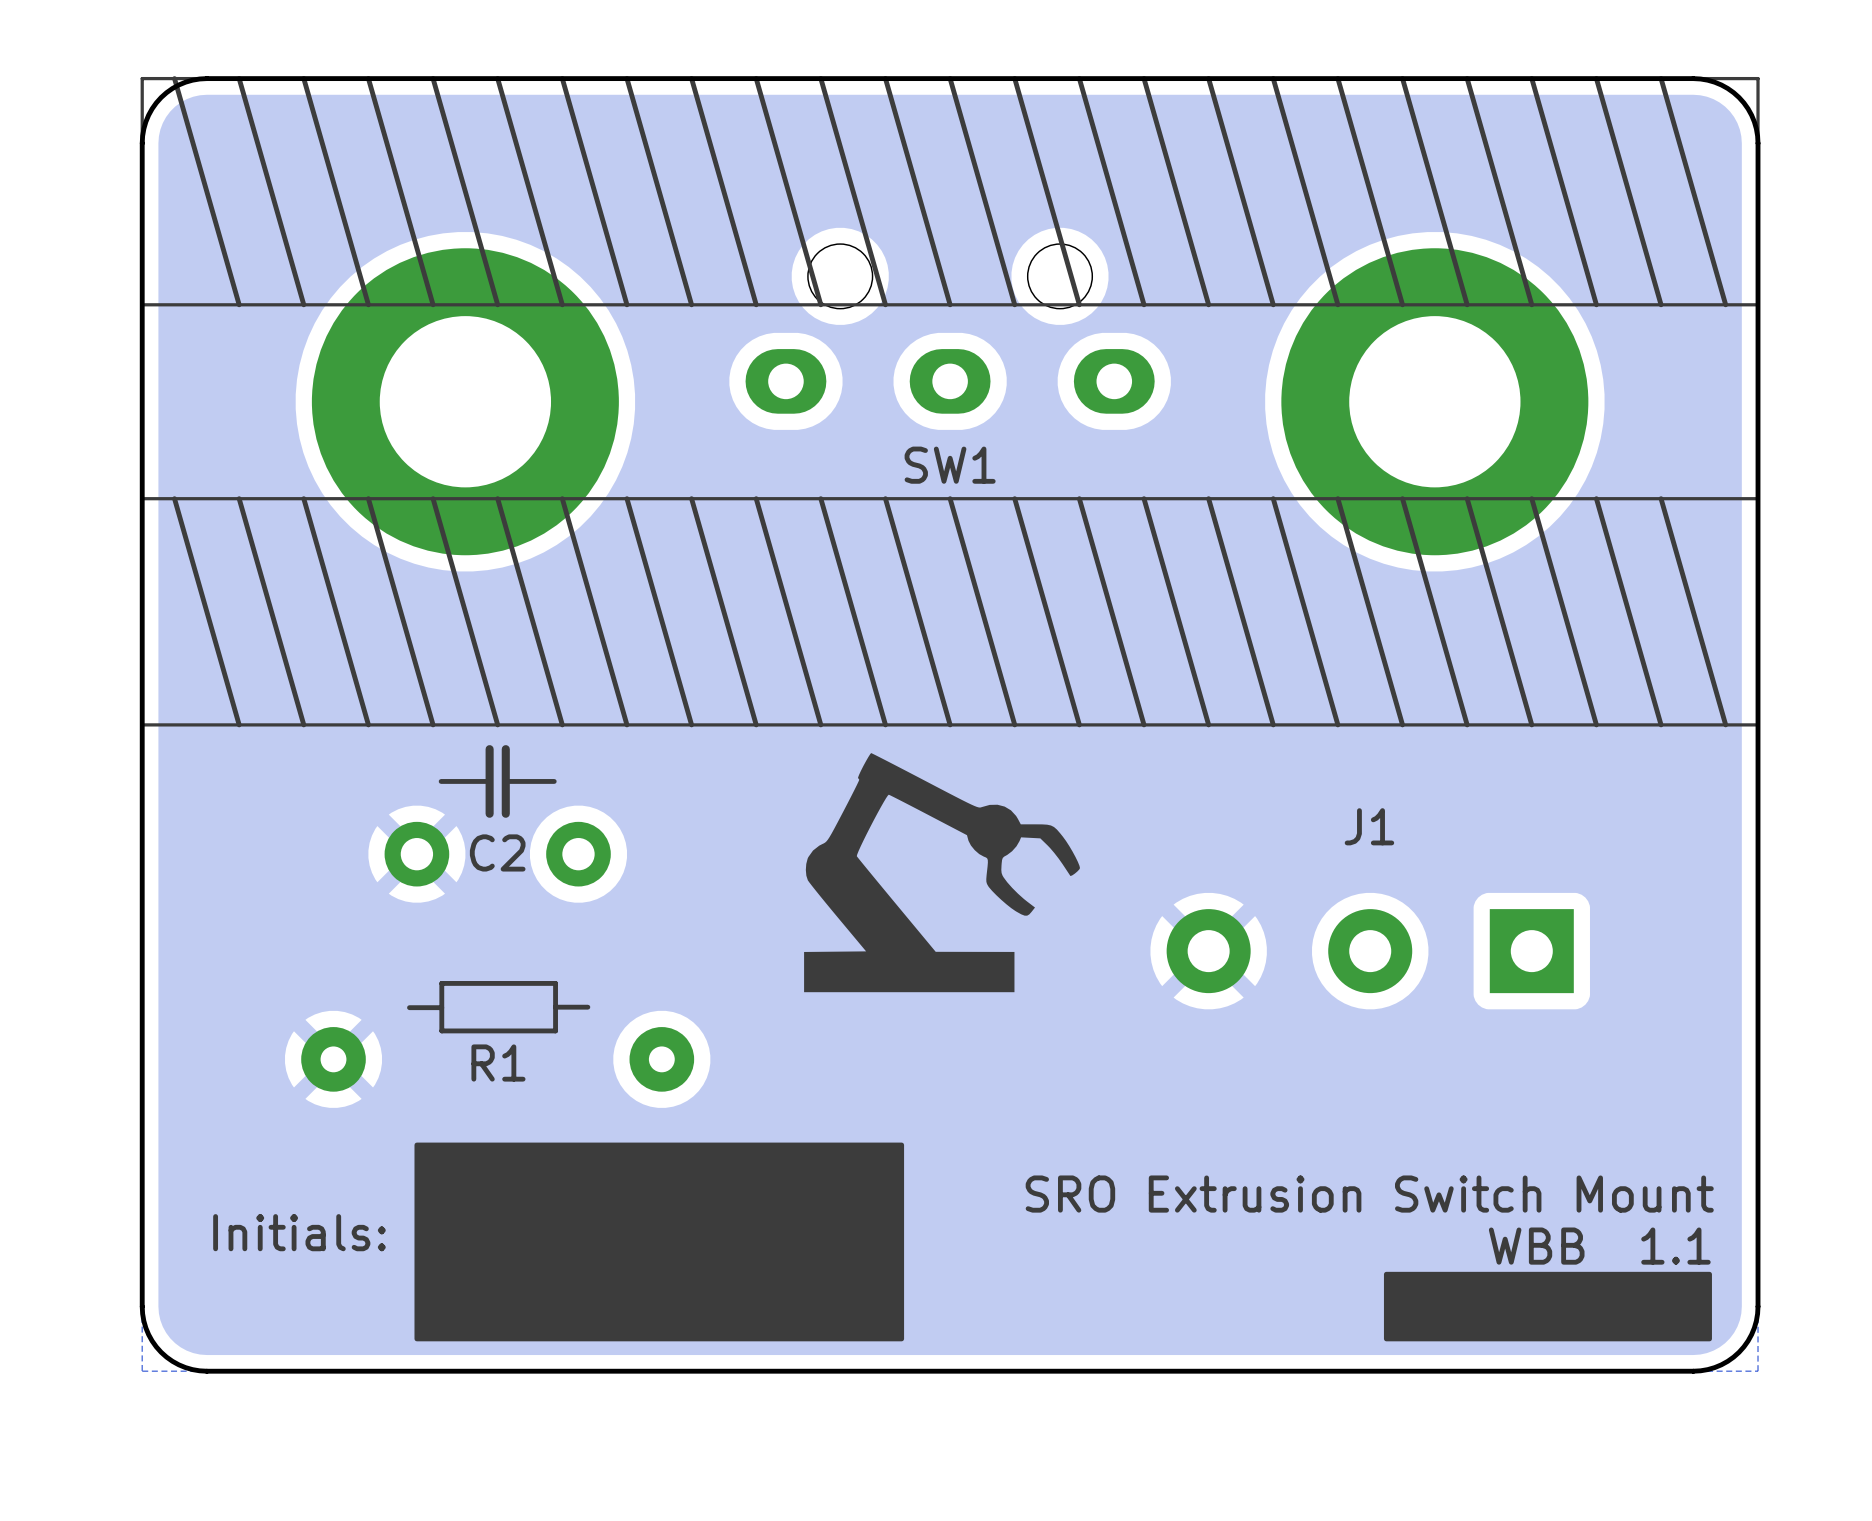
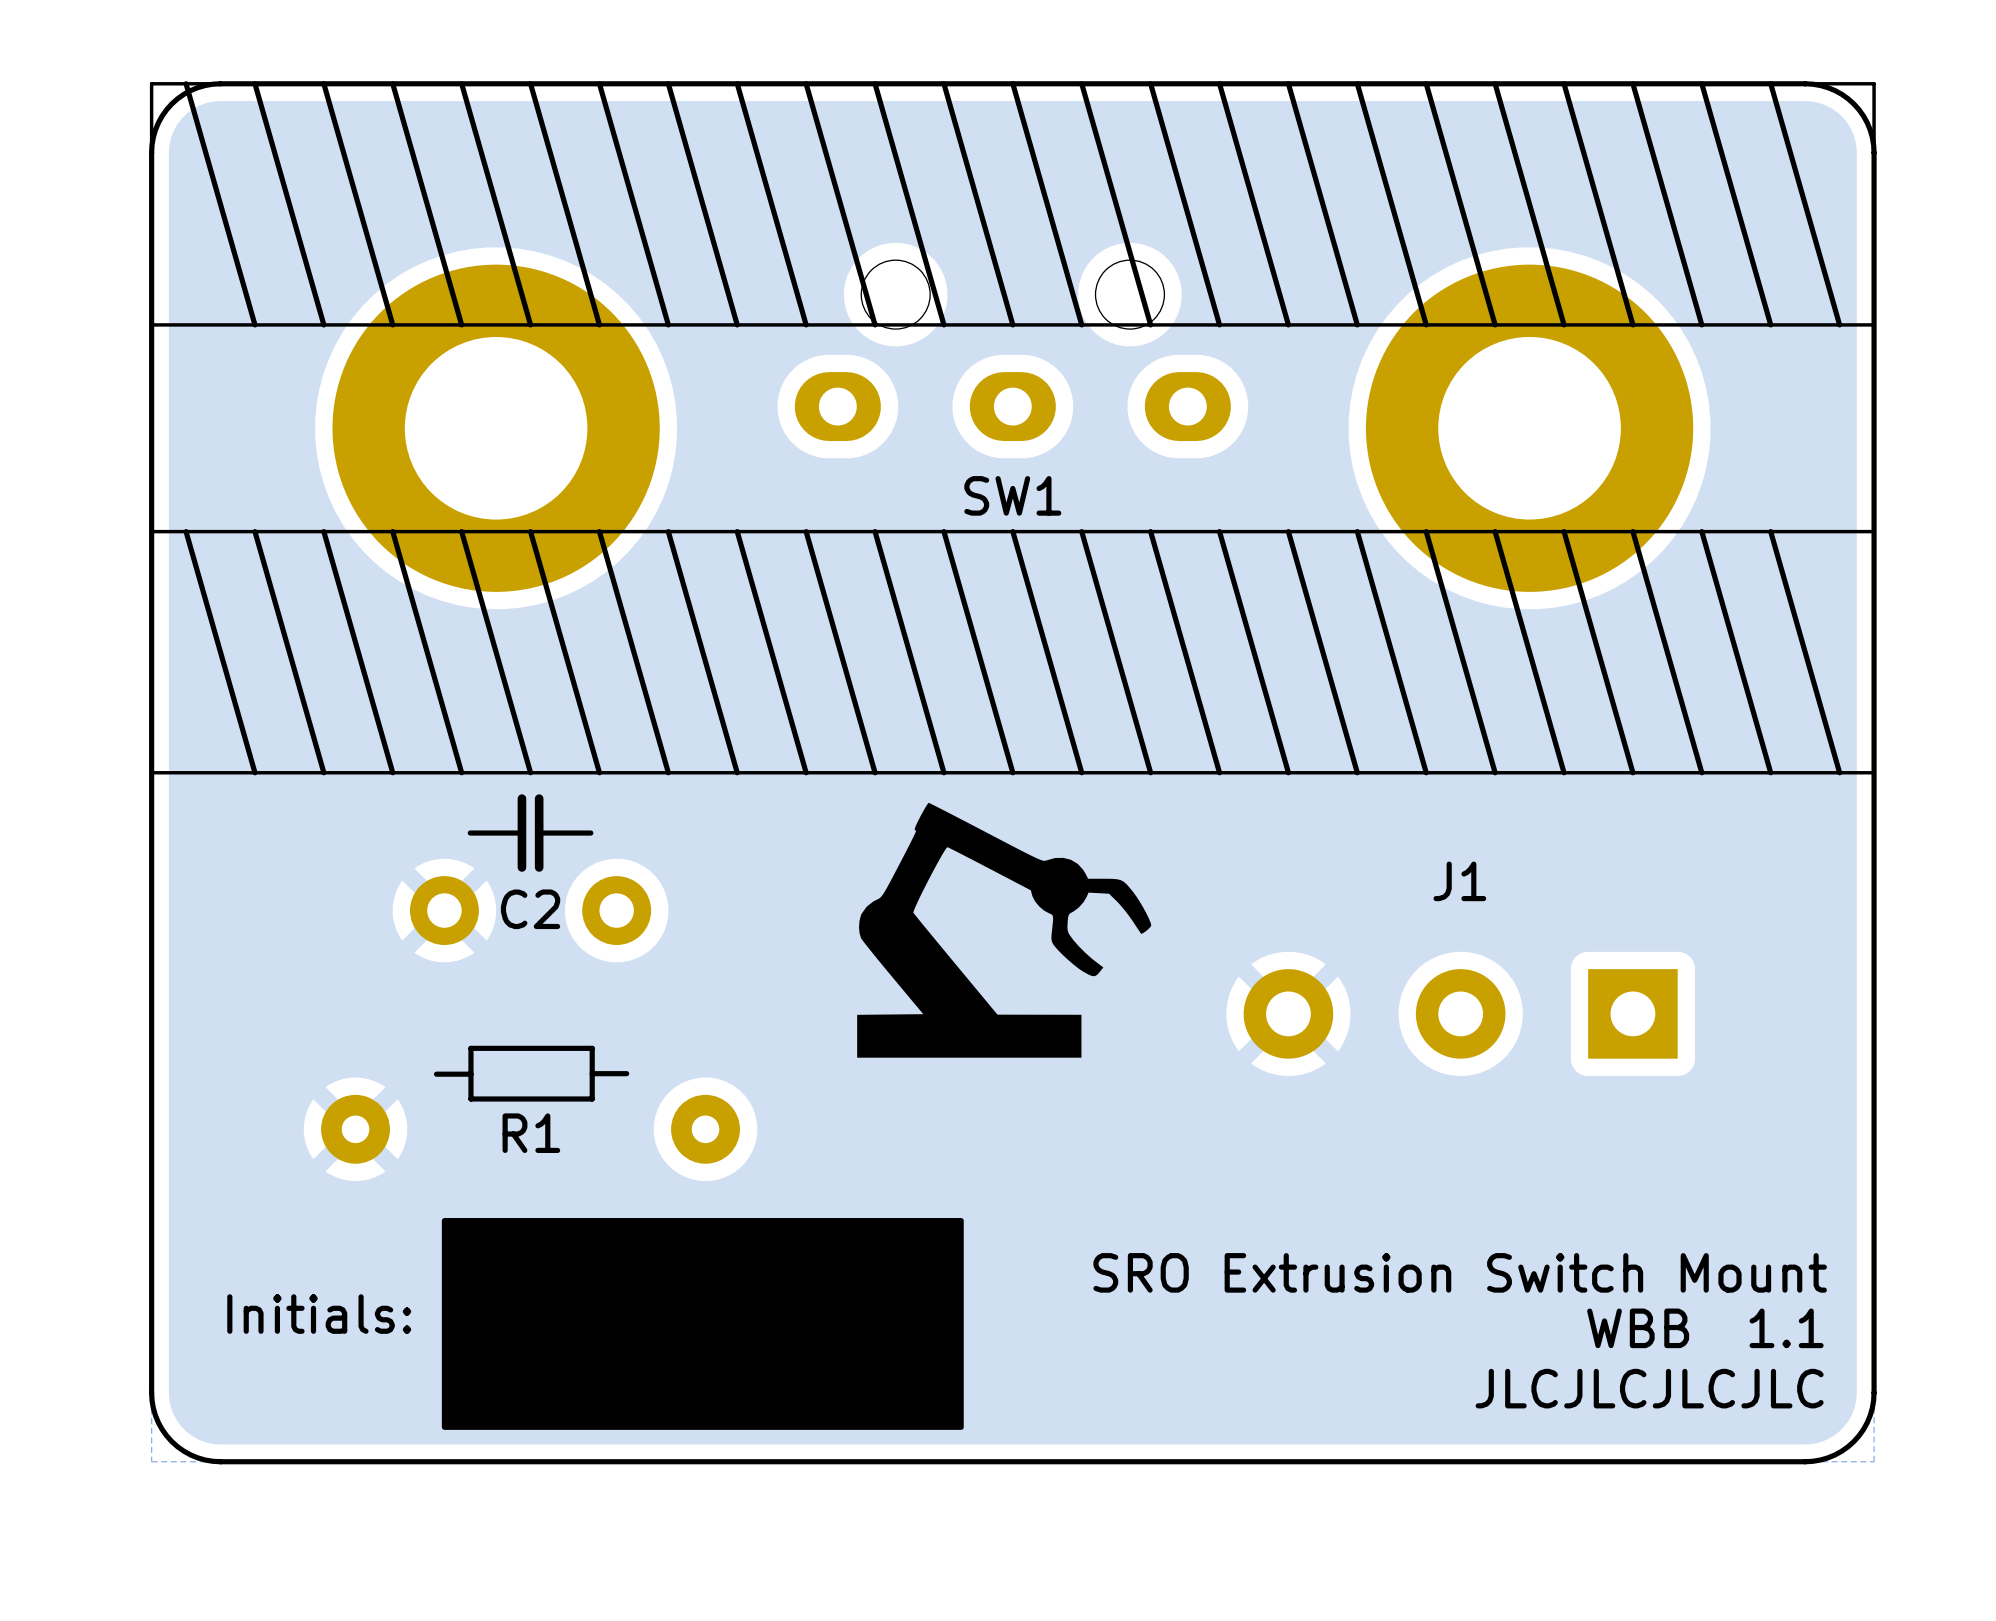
drawing: [1383, 1271, 1712, 1342] -> none
text: none -> JLCJLCJLCJLC (1649, 1388)

